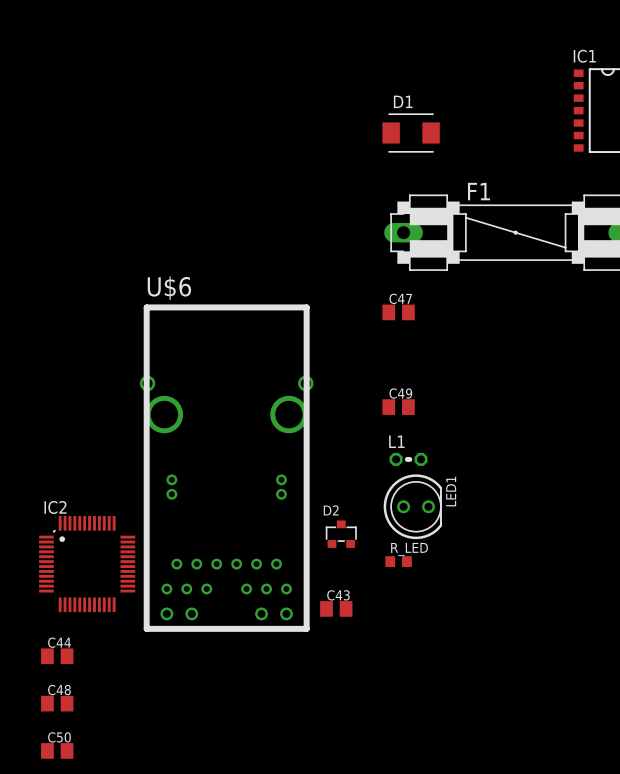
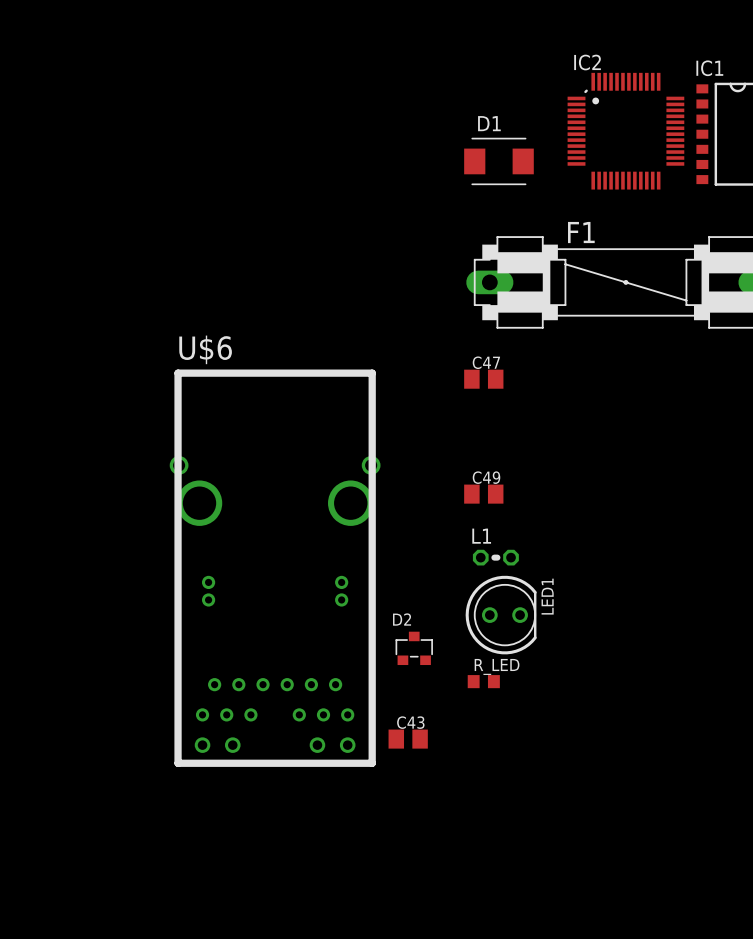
IC2 position: (87, 564) -> (625, 131)
C44: (57, 656) -> none
C48: (57, 703) -> none
C50: (57, 750) -> none

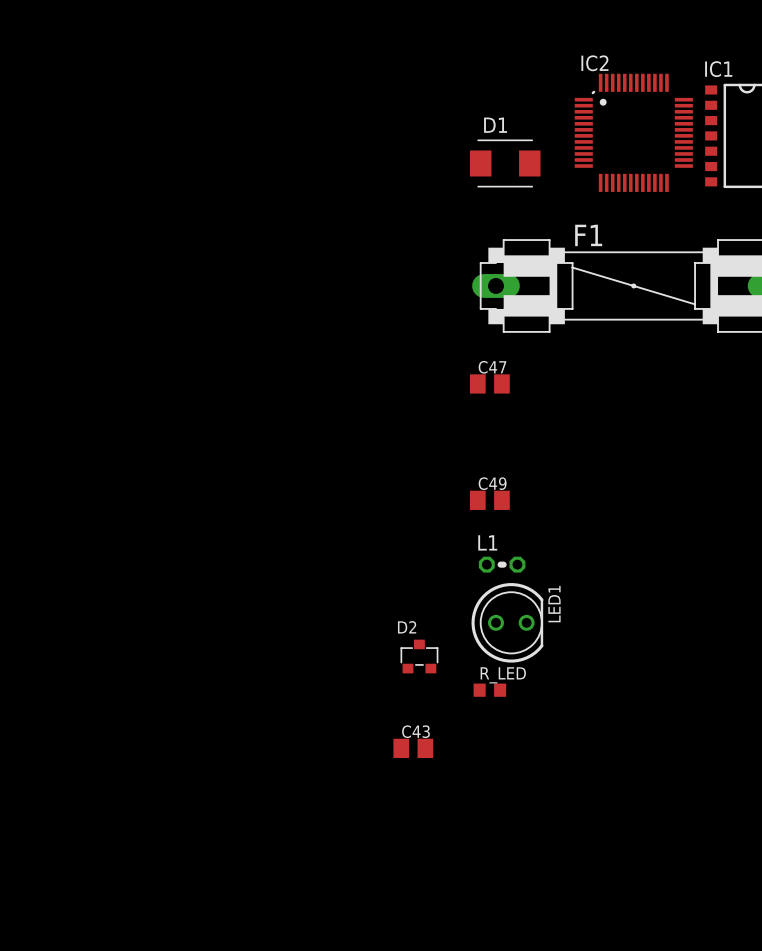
U$6: (275, 568) -> none

